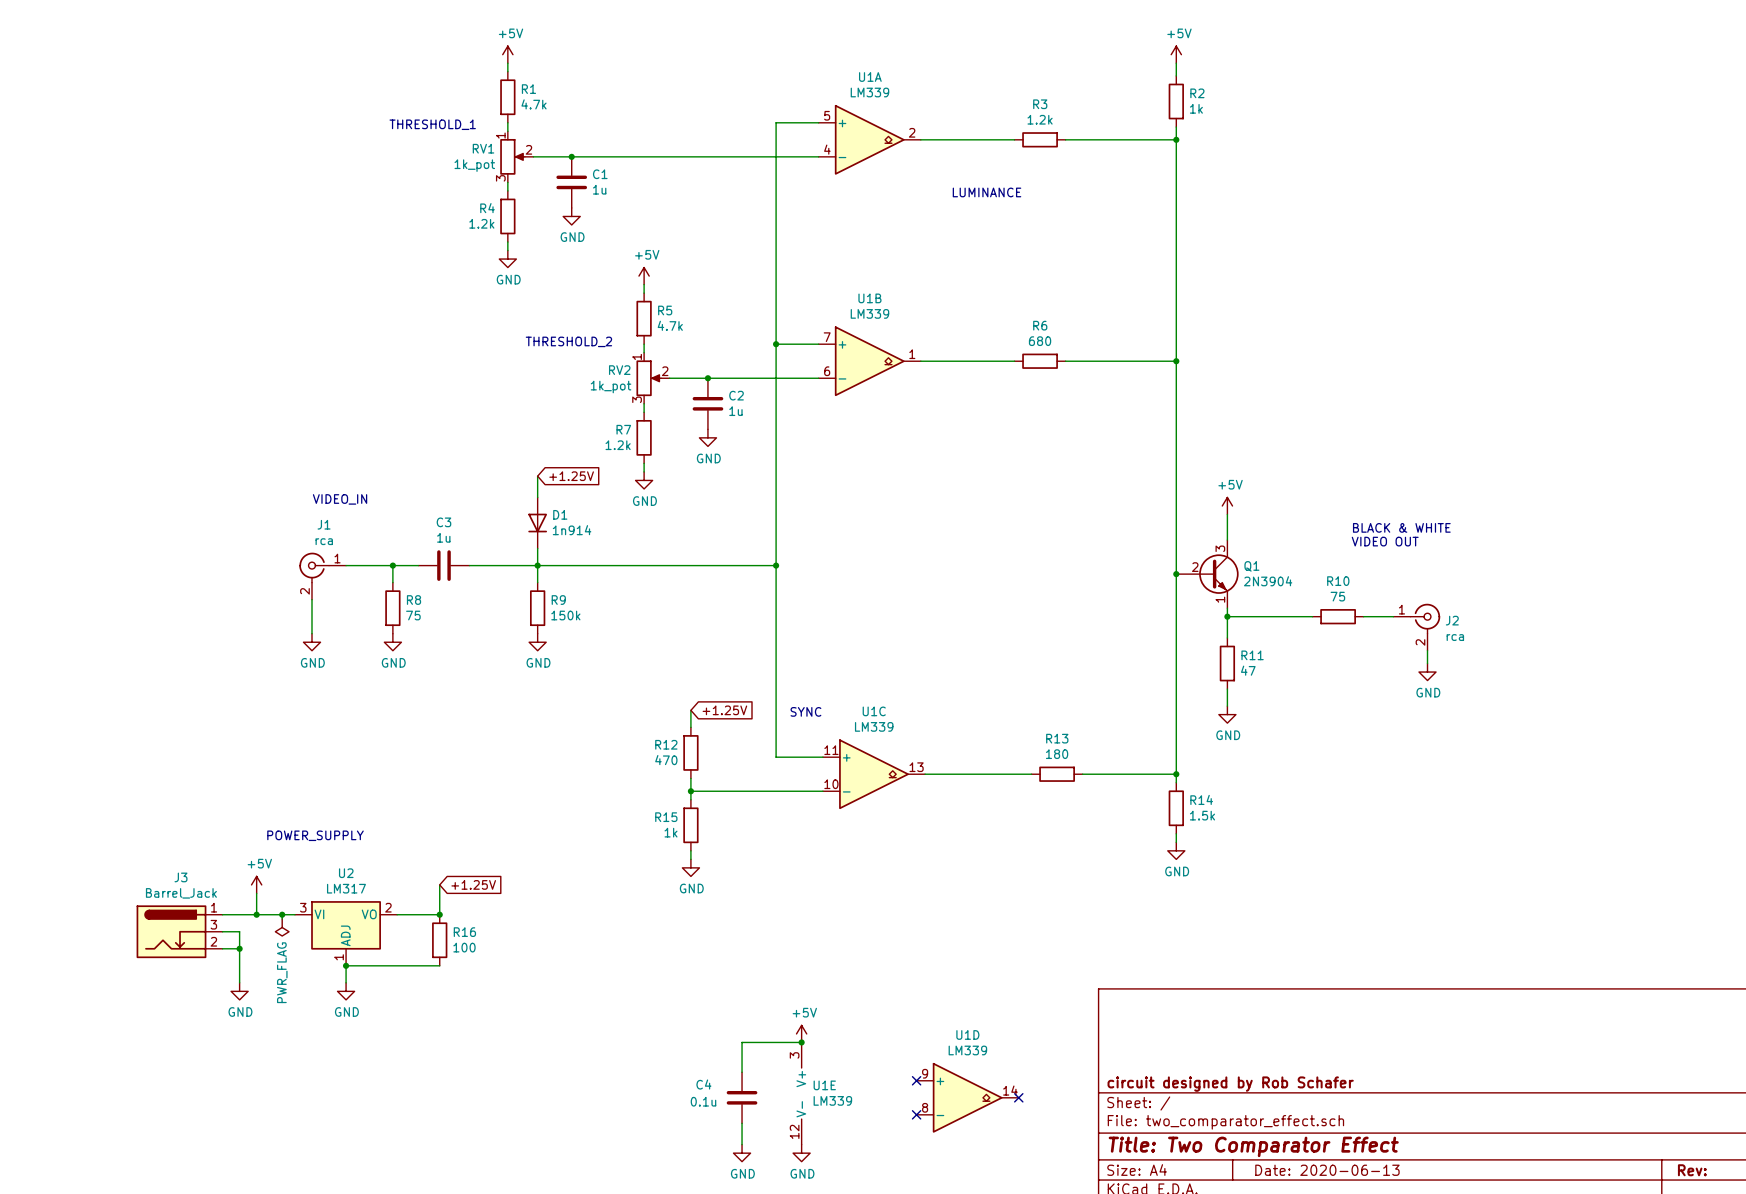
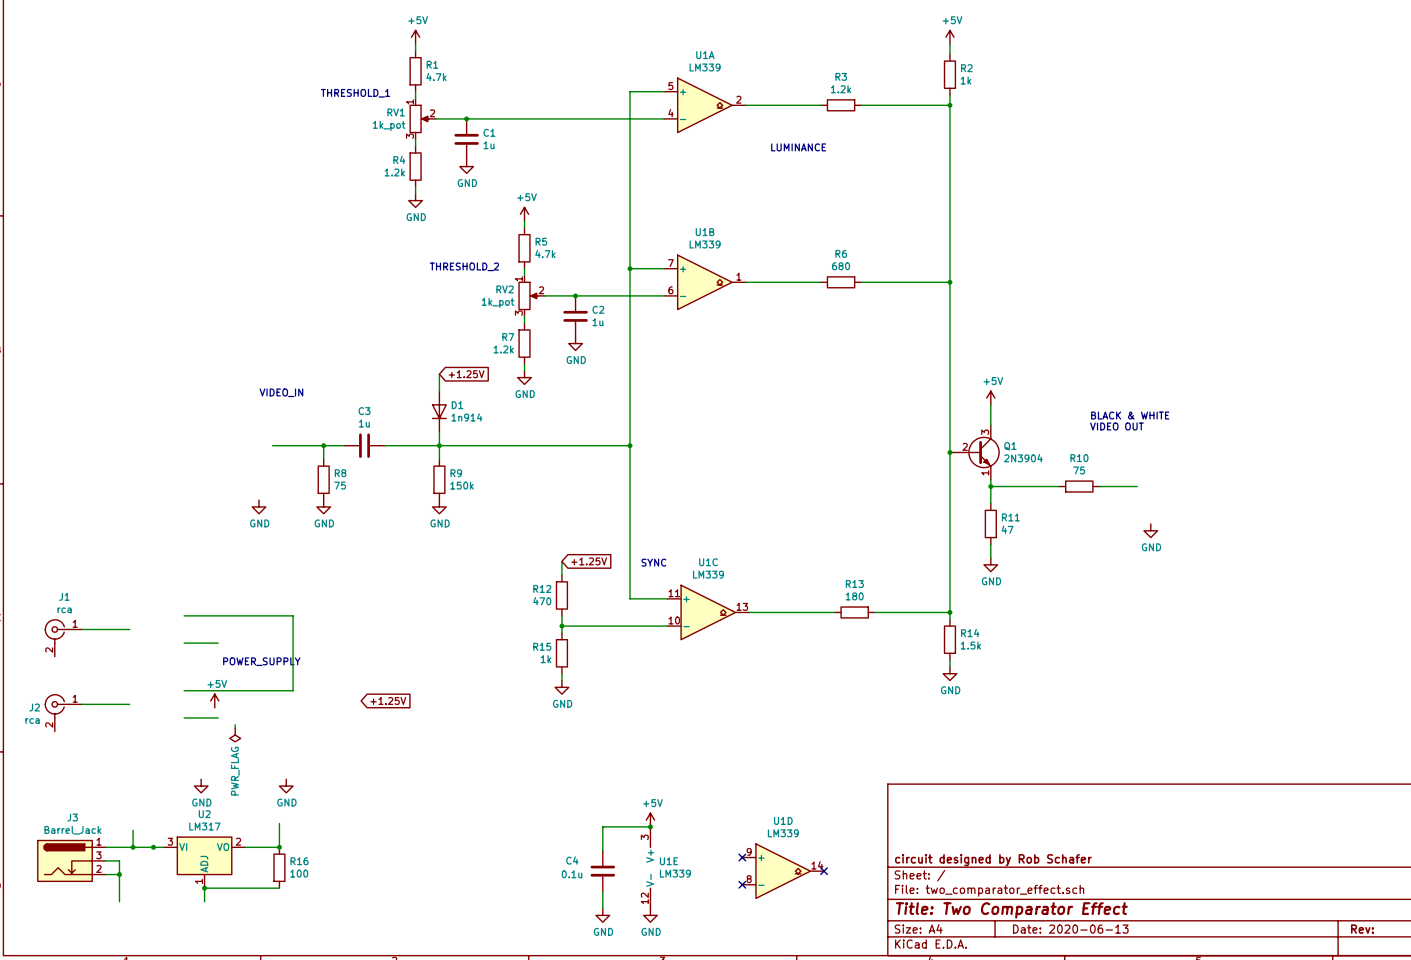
J1 position: (322, 576) -> (63, 637)
wire: (311, 599) (311, 633) -> none
J2 flip: as is (1425, 618) -> left-right (56, 706)
J2 position: (1416, 627) -> (63, 712)
wire: (1427, 650) (1427, 663) -> none
wire: none -> (184, 615) (293, 615) (293, 690) (184, 690)
wire: none -> (82, 629) (129, 629)
wire: none -> (184, 643) (218, 643)
wire: (439, 884) (439, 914) (397, 914) -> none
wire: none -> (82, 704) (129, 704)
wire: (256, 893) (256, 914) -> none
wire: none -> (184, 717) (218, 717)
wire: (222, 914) (294, 914) -> none
junction: (256, 914) -> none
junction: (282, 914) -> none
junction: (439, 914) -> none
J3 position: (179, 931) -> (71, 860)
wire: (222, 931) (239, 931) (239, 982) -> none
U2 position: (346, 933) -> (204, 862)
R16 position: (439, 940) -> (279, 867)
wire: (222, 948) (239, 948) -> none
junction: (239, 948) -> none
junction: (346, 965) -> none
wire: (439, 965) (346, 965) (346, 982) -> none
wire: none -> (279, 823) (279, 847) (245, 847)
wire: none -> (133, 830) (133, 847)
wire: none -> (105, 847) (163, 847)
junction: none -> (133, 847)
junction: none -> (153, 847)
junction: none -> (279, 847)
wire: none -> (105, 860) (119, 860) (119, 901)
wire: none -> (105, 874) (119, 874)
junction: none -> (119, 874)
junction: none -> (204, 888)
wire: none -> (279, 888) (204, 888) (204, 901)

